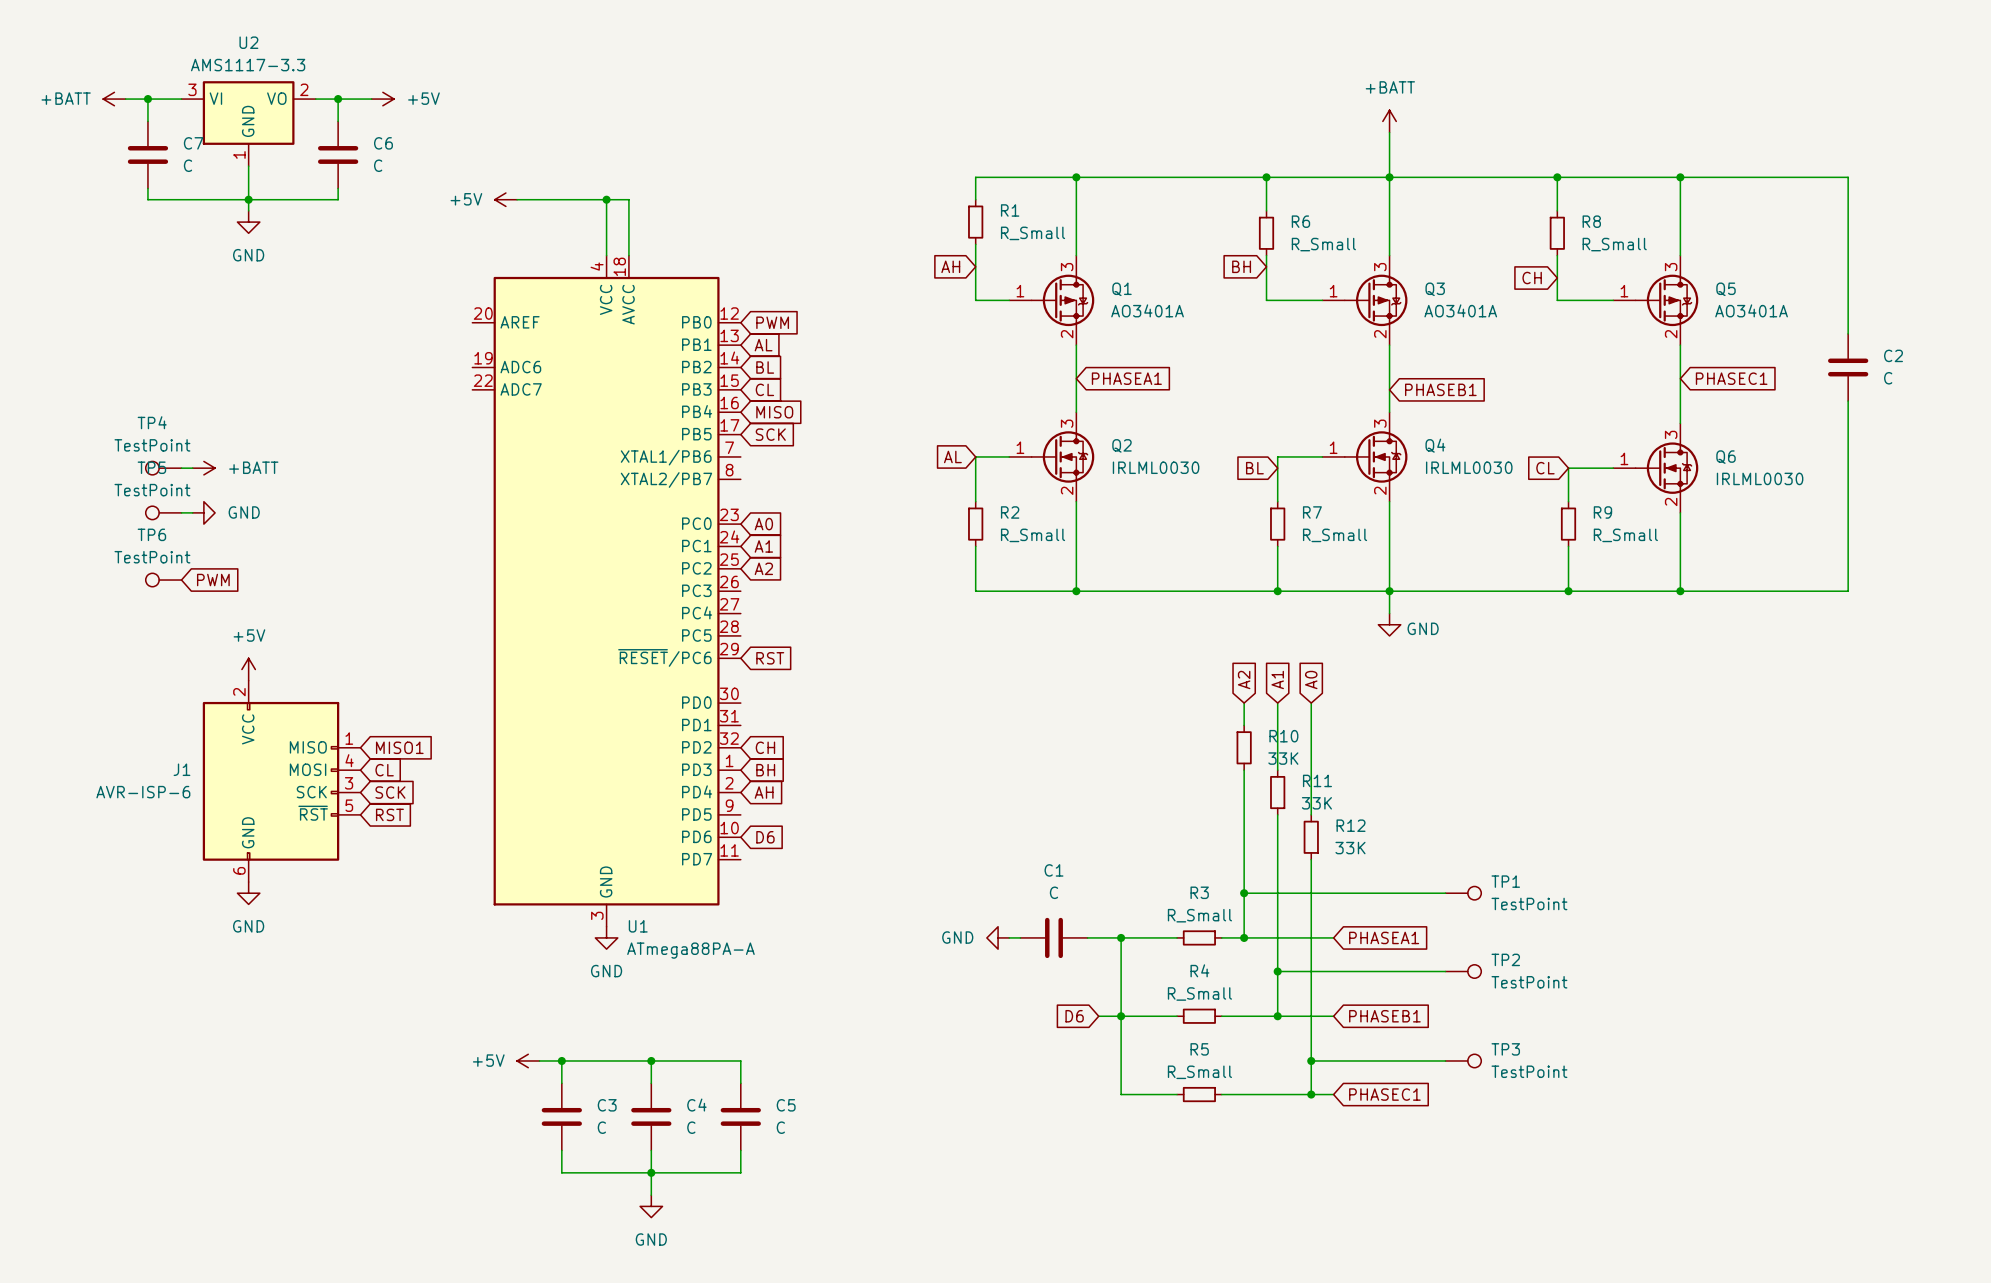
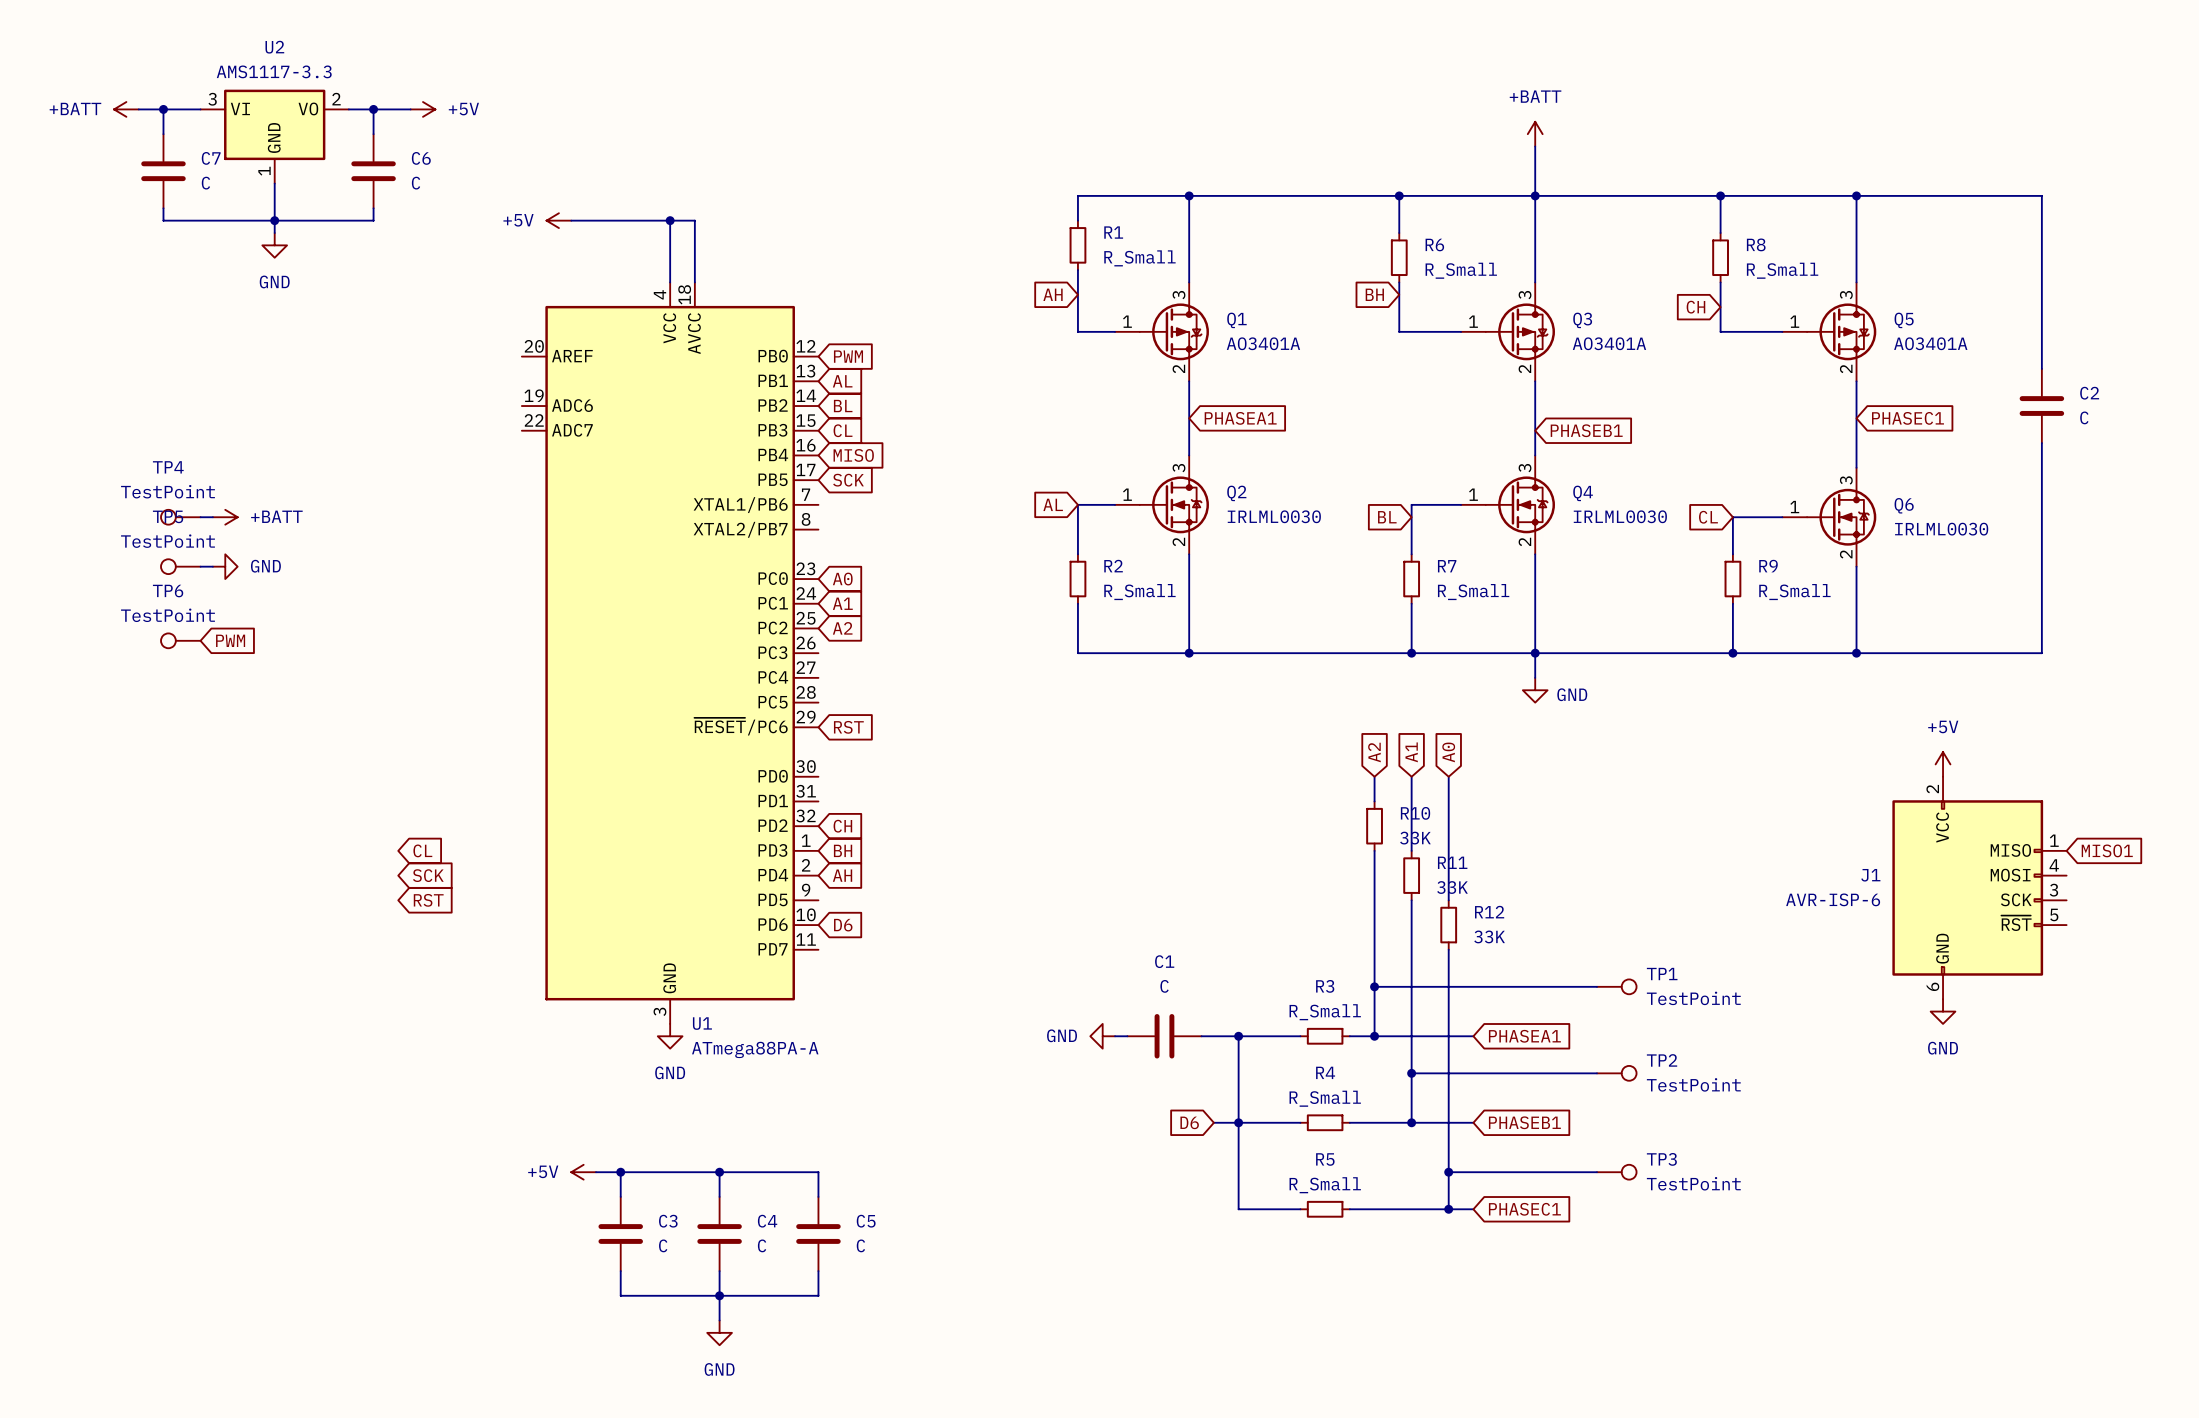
power symbol: +5V (248, 669) -> none
power symbol: none -> +5V (1943, 764)
global label: MISO1 (399, 747) -> none
global label: none -> MISO1 (2107, 850)
J1 position: (281, 781) -> (1979, 887)
power symbol: GND (248, 893) -> none
power symbol: none -> GND (1943, 1011)

